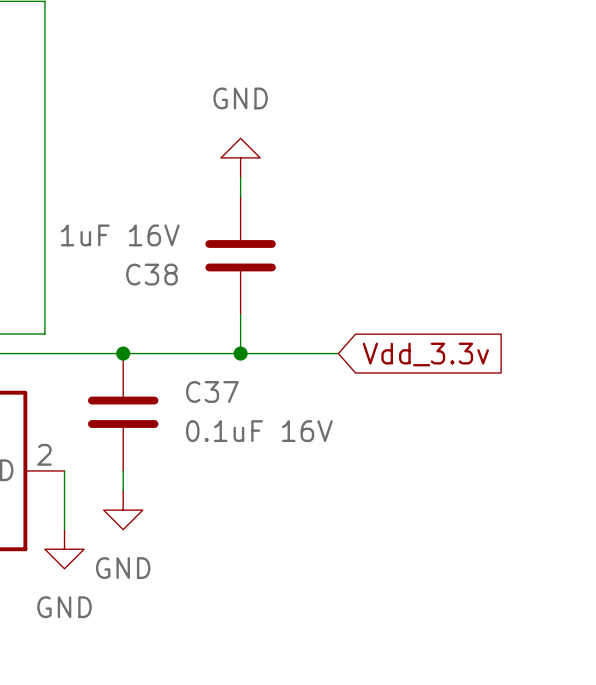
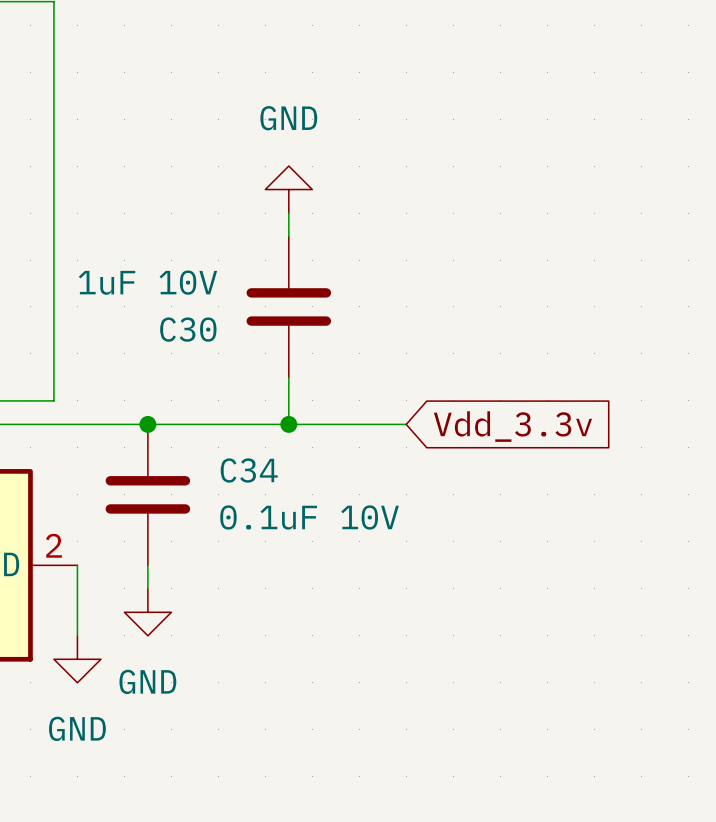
C38 value: 1uF 16V (120, 235) -> 1uF 10V (147, 282)
C38 name: C38 (151, 274) -> C30 (188, 329)
C37 name: C37 (212, 391) -> C34 (249, 470)
C37 value: 0.1uF 16V (259, 431) -> 0.1uF 10V (309, 517)

